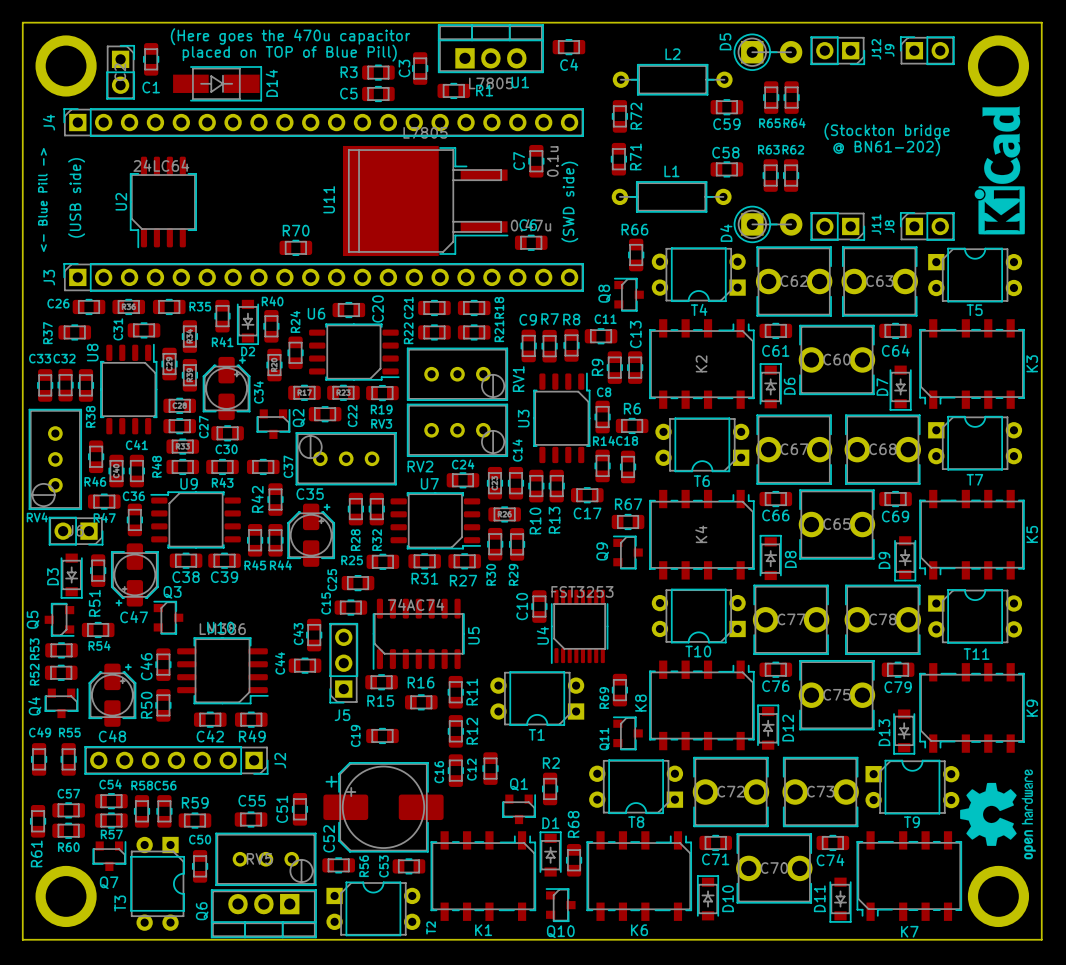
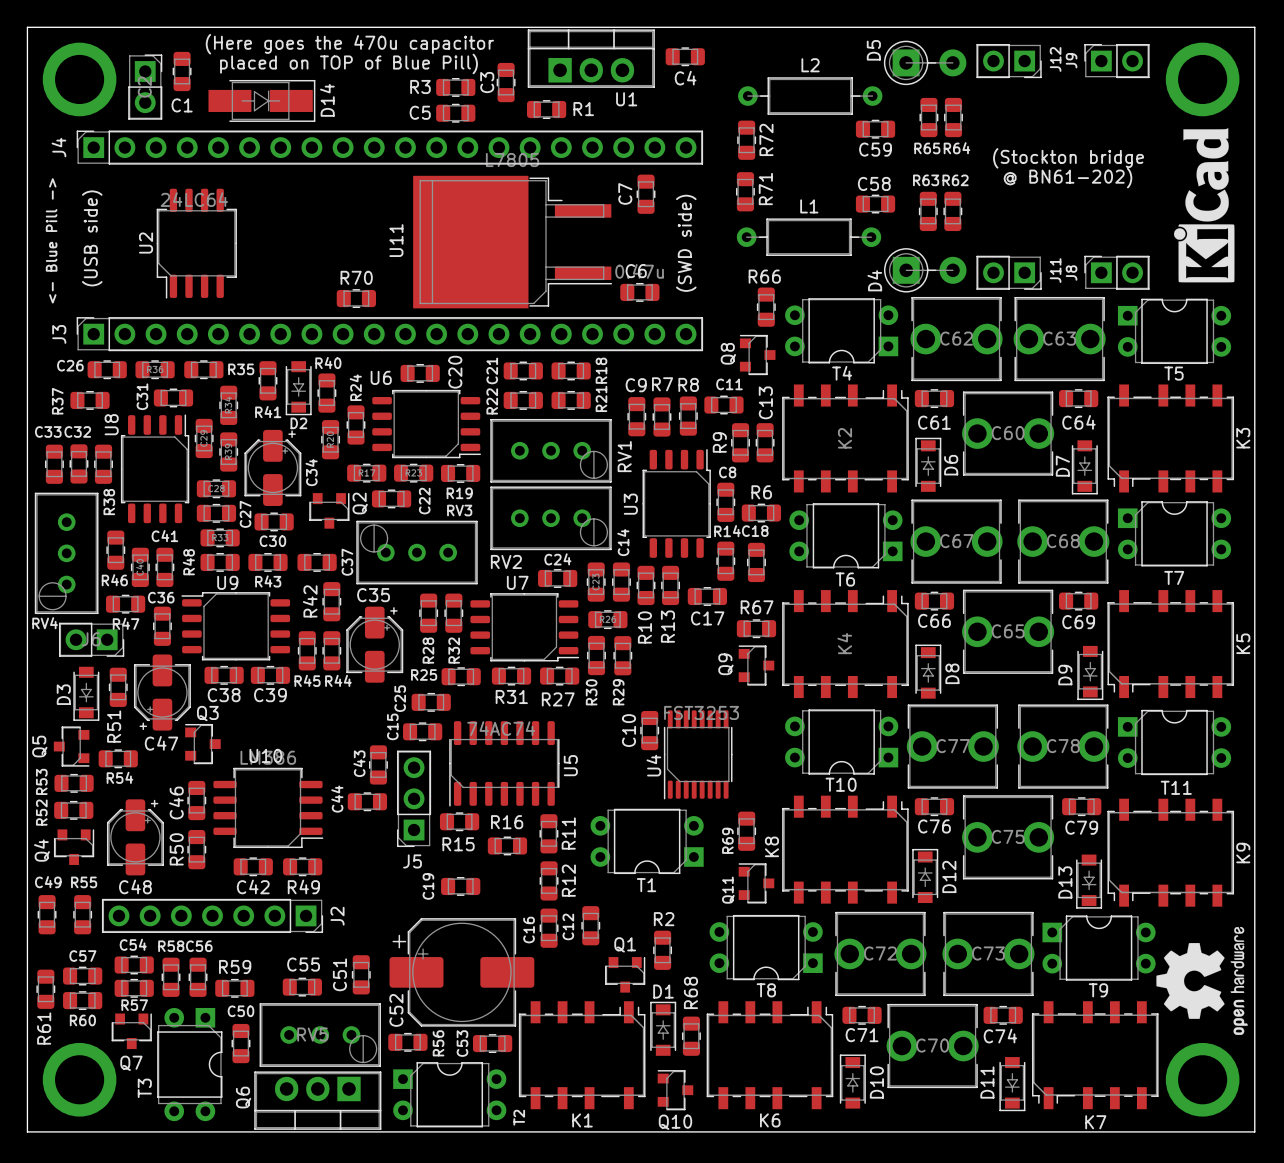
U1 value: L7805 (491, 83) -> none
C7 value: 0.1u (552, 161) -> none

